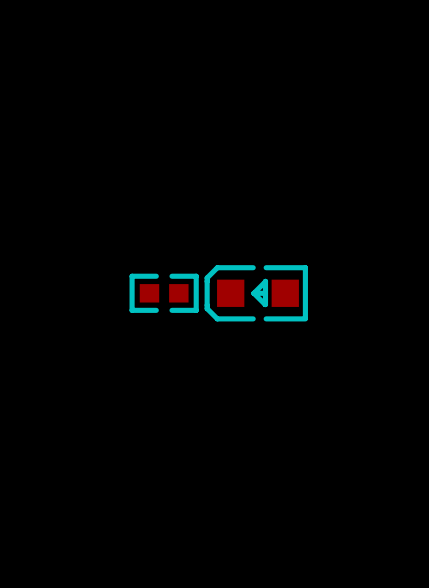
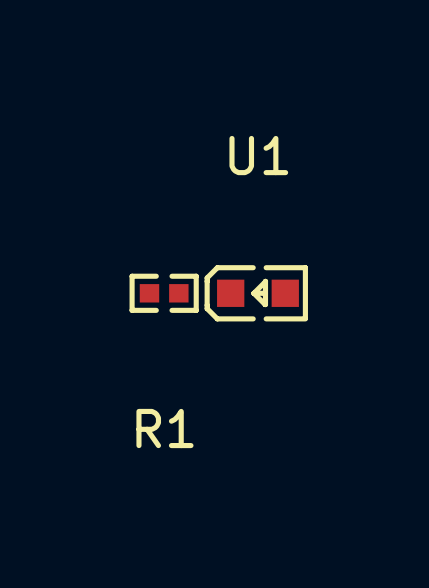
U1 name: none -> U1 (258, 155)
R1 name: none -> R1 (164, 428)

